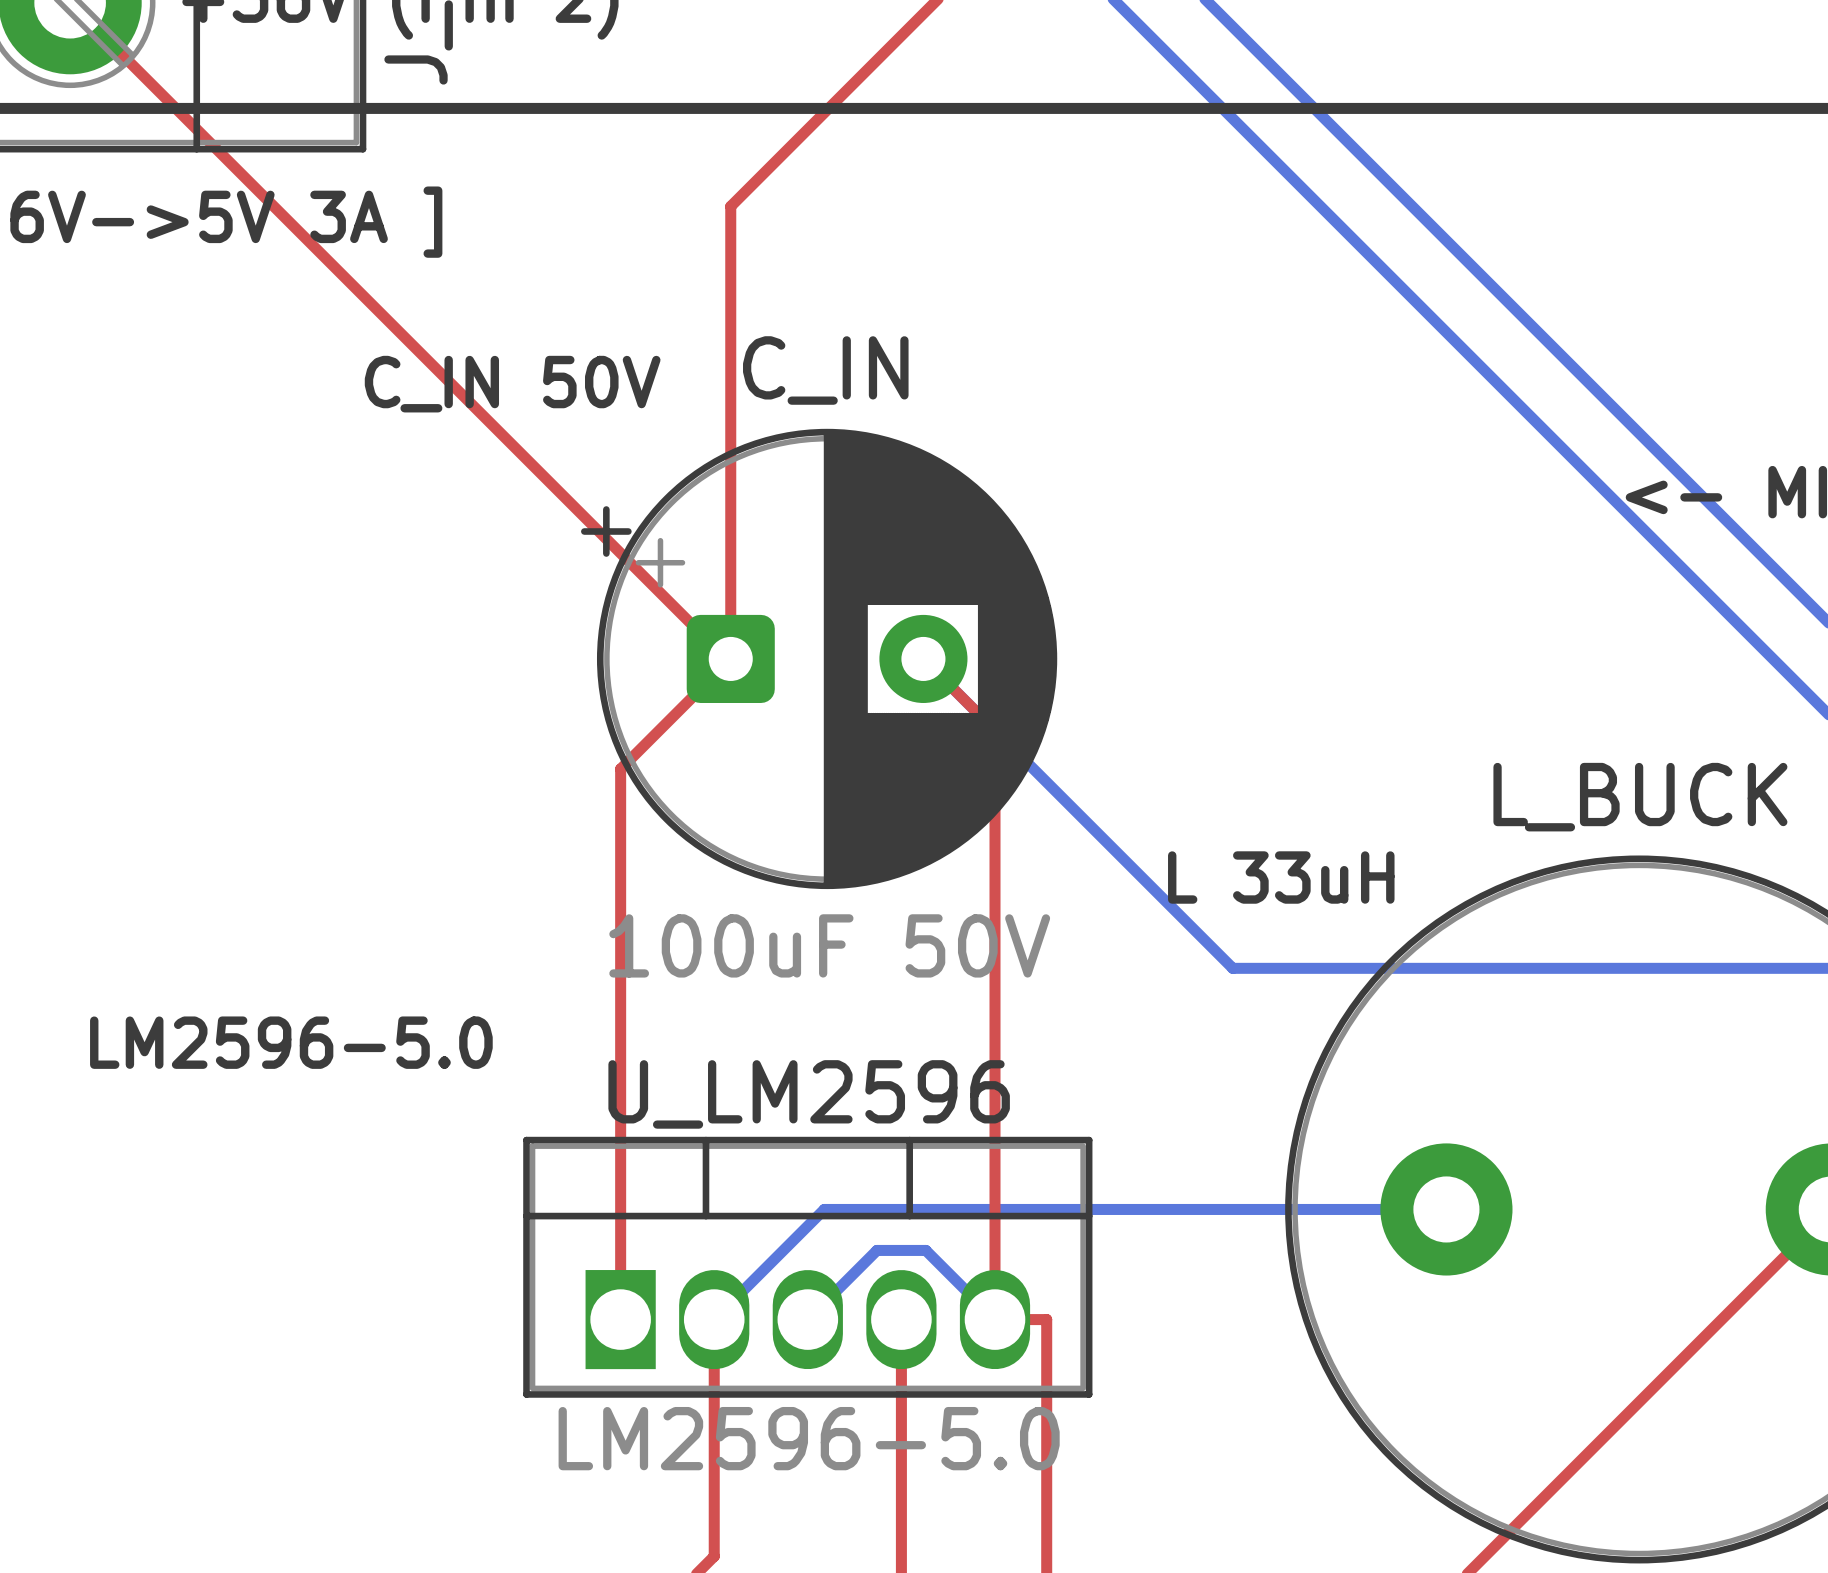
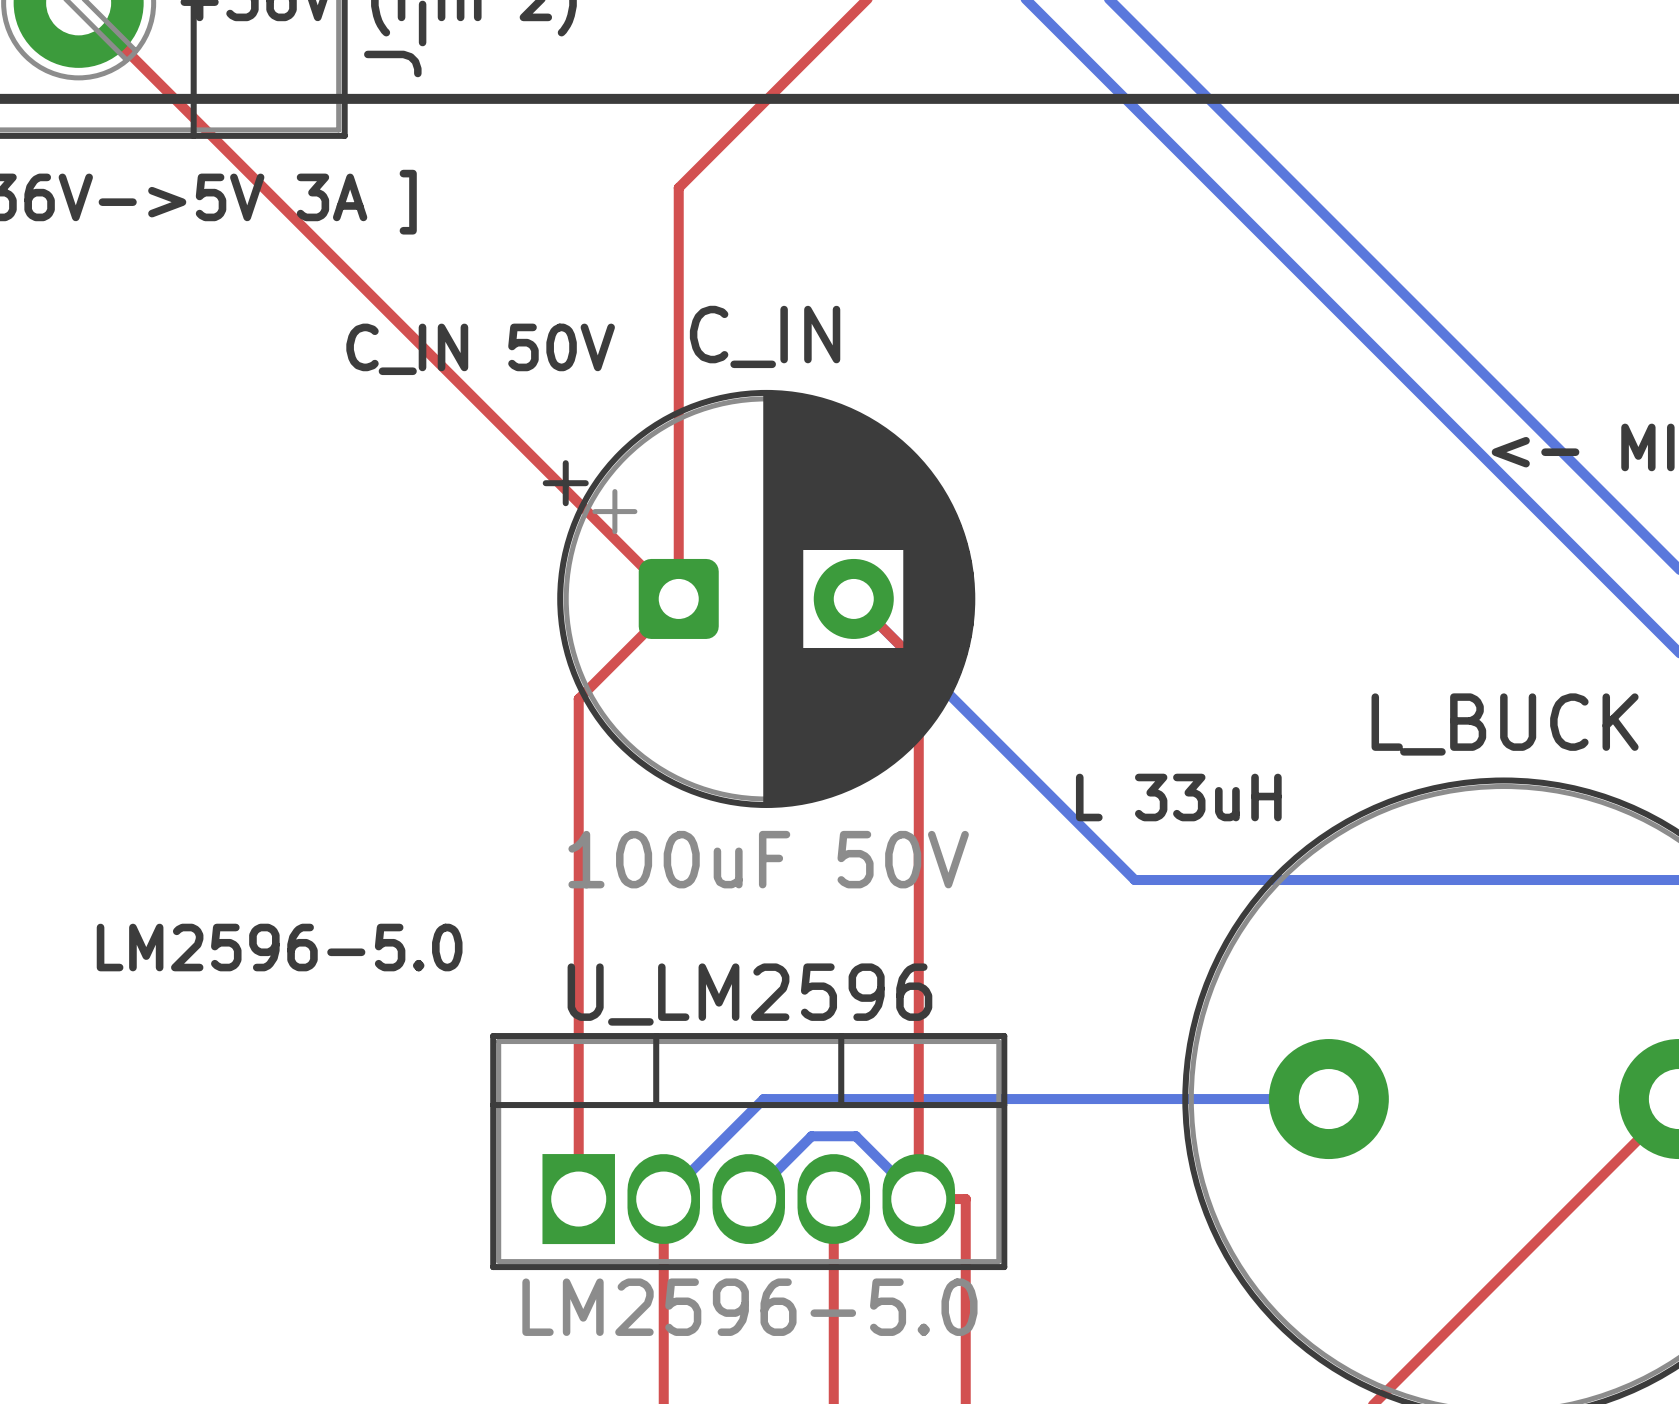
U_LM2596 footprint: [523, 1136, 1093, 1398] -> [490, 1033, 1008, 1271]

